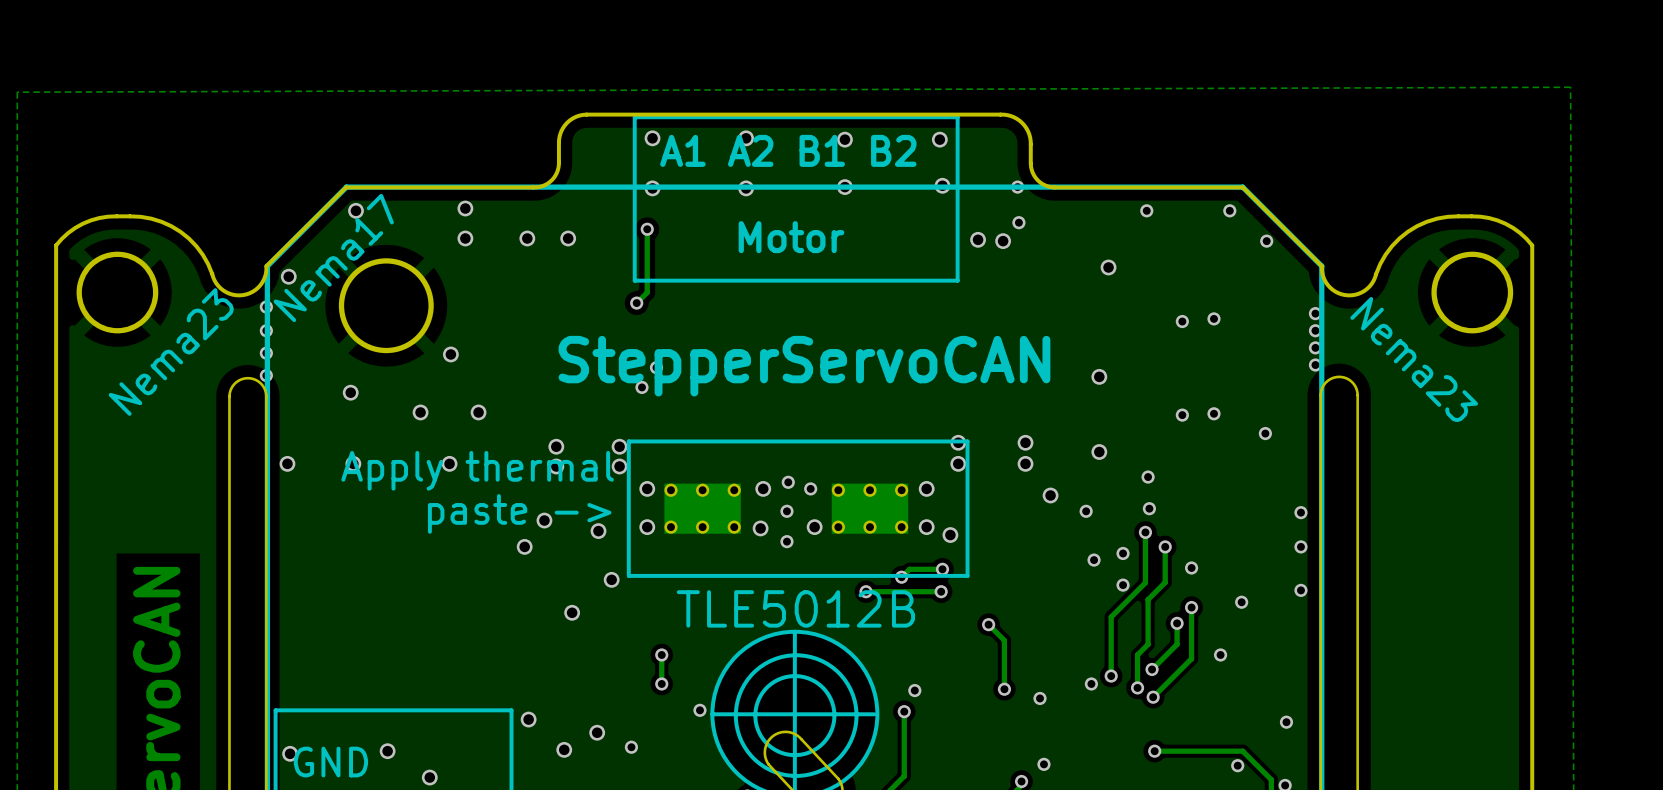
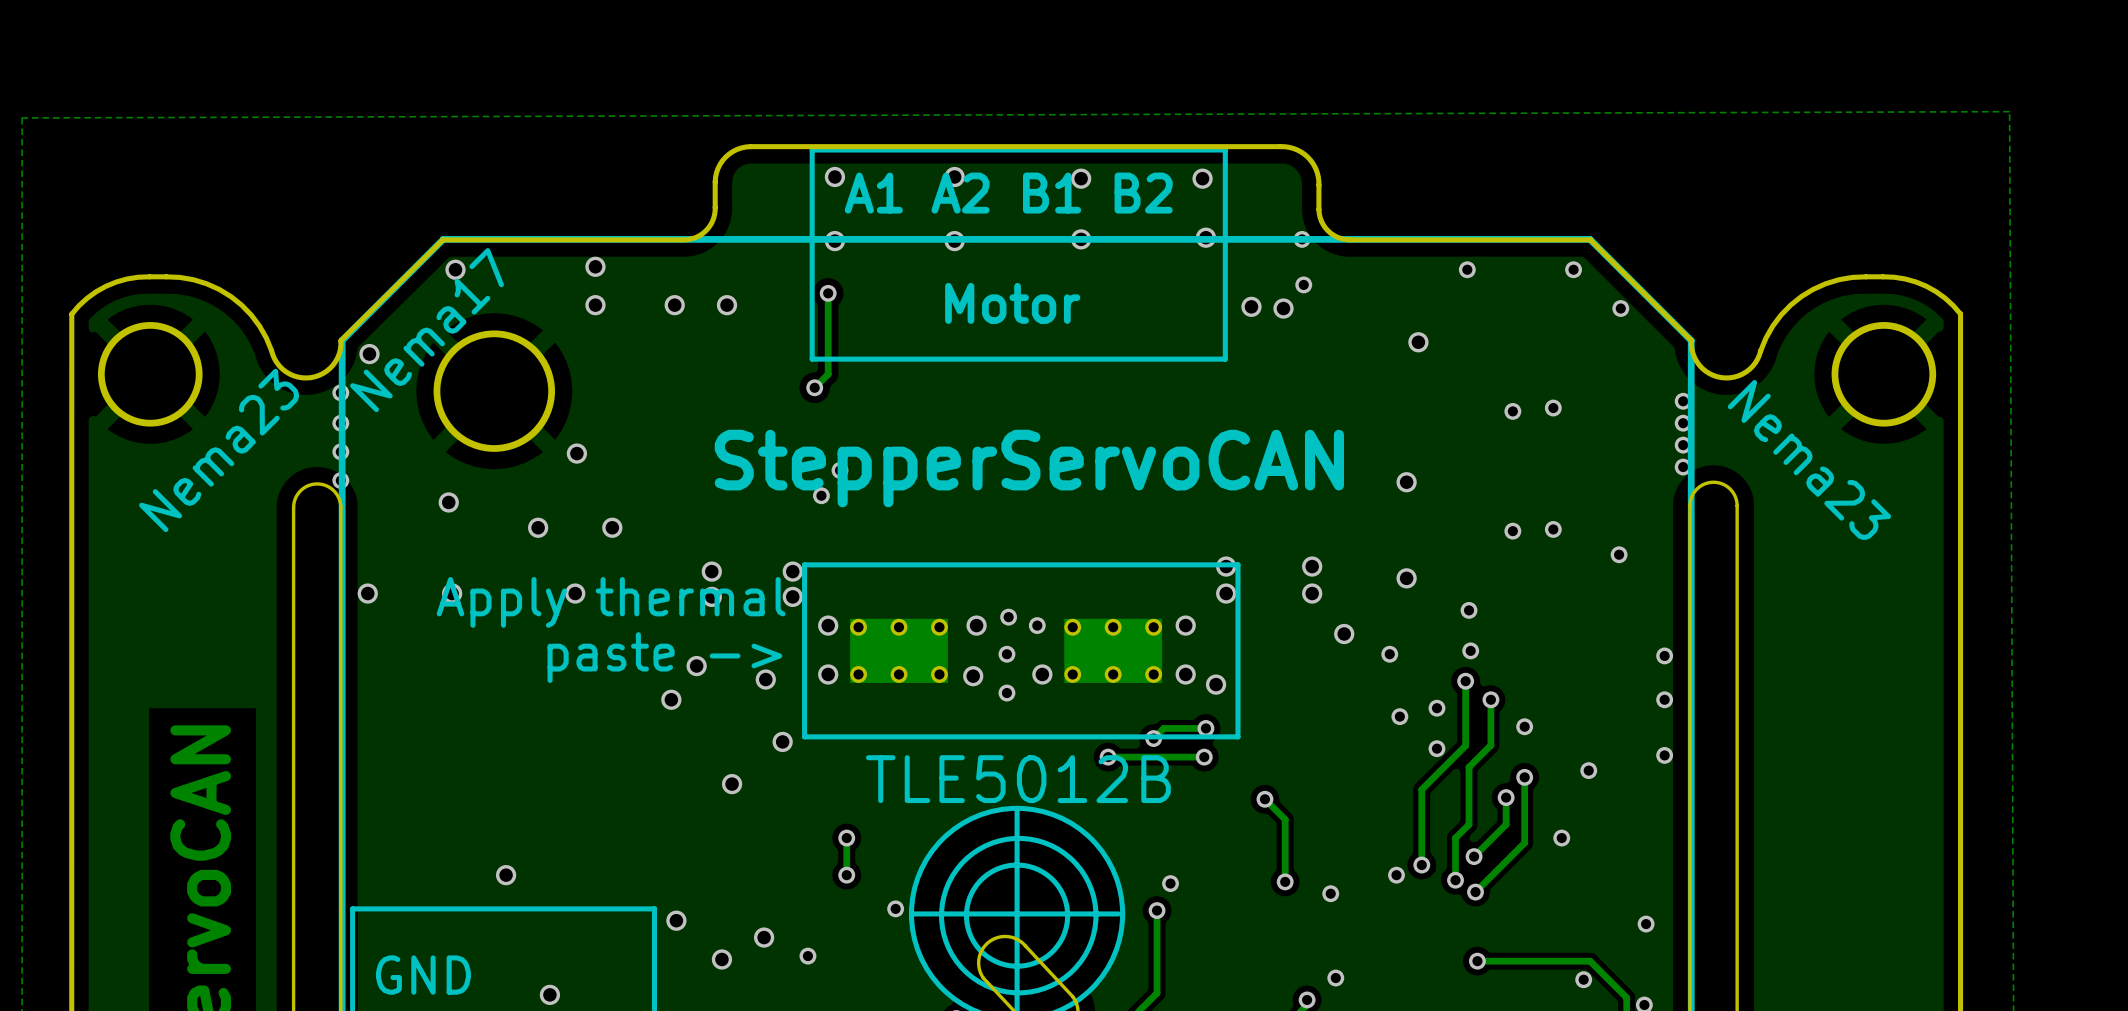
via: none -> (506, 875)
via: (387, 751) -> none
via: (290, 753) -> none

